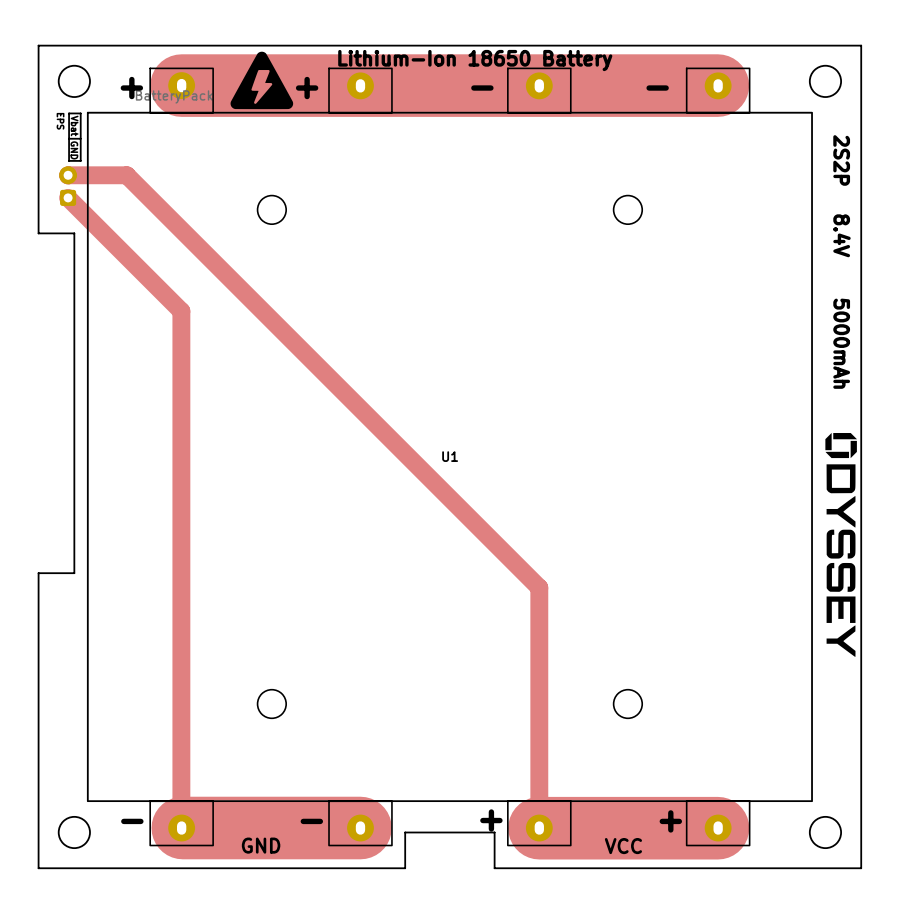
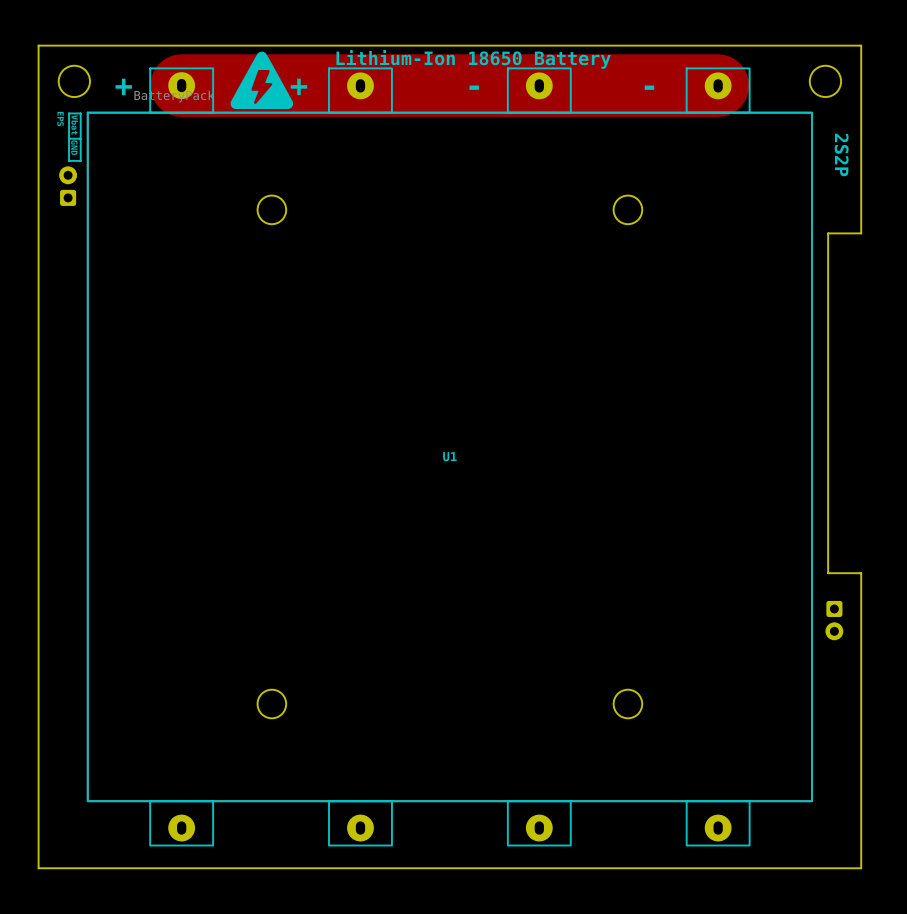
track: (68, 175) (126, 175) (539, 587) (539, 828) (718, 828) -> none
track: (68, 197) (181, 311) (181, 828) -> none
board edge: (38, 233) (74, 233) (74, 573) (38, 573) -> (38, 233) (38, 573)
board edge: (861, 233) (861, 573) -> (861, 233) (828, 233) (828, 573) (861, 573)
text: 8.4V 5000mAh (841, 301) -> none
drawing: [825, 432, 857, 657] -> none
part: none -> (834, 620)
round board edge: [57, 815, 91, 850] -> none
round board edge: [808, 815, 842, 850] -> none
text: + (491, 820) -> none
text: - (132, 821) -> none
text: - (311, 821) -> none
text: + (670, 821) -> none
track: (360, 828) (182, 828) -> none
text: GND (261, 845) -> none
text: VCC (623, 846) -> none
board edge: (405, 868) (405, 832) (494, 832) (494, 868) -> (405, 868) (494, 868)

